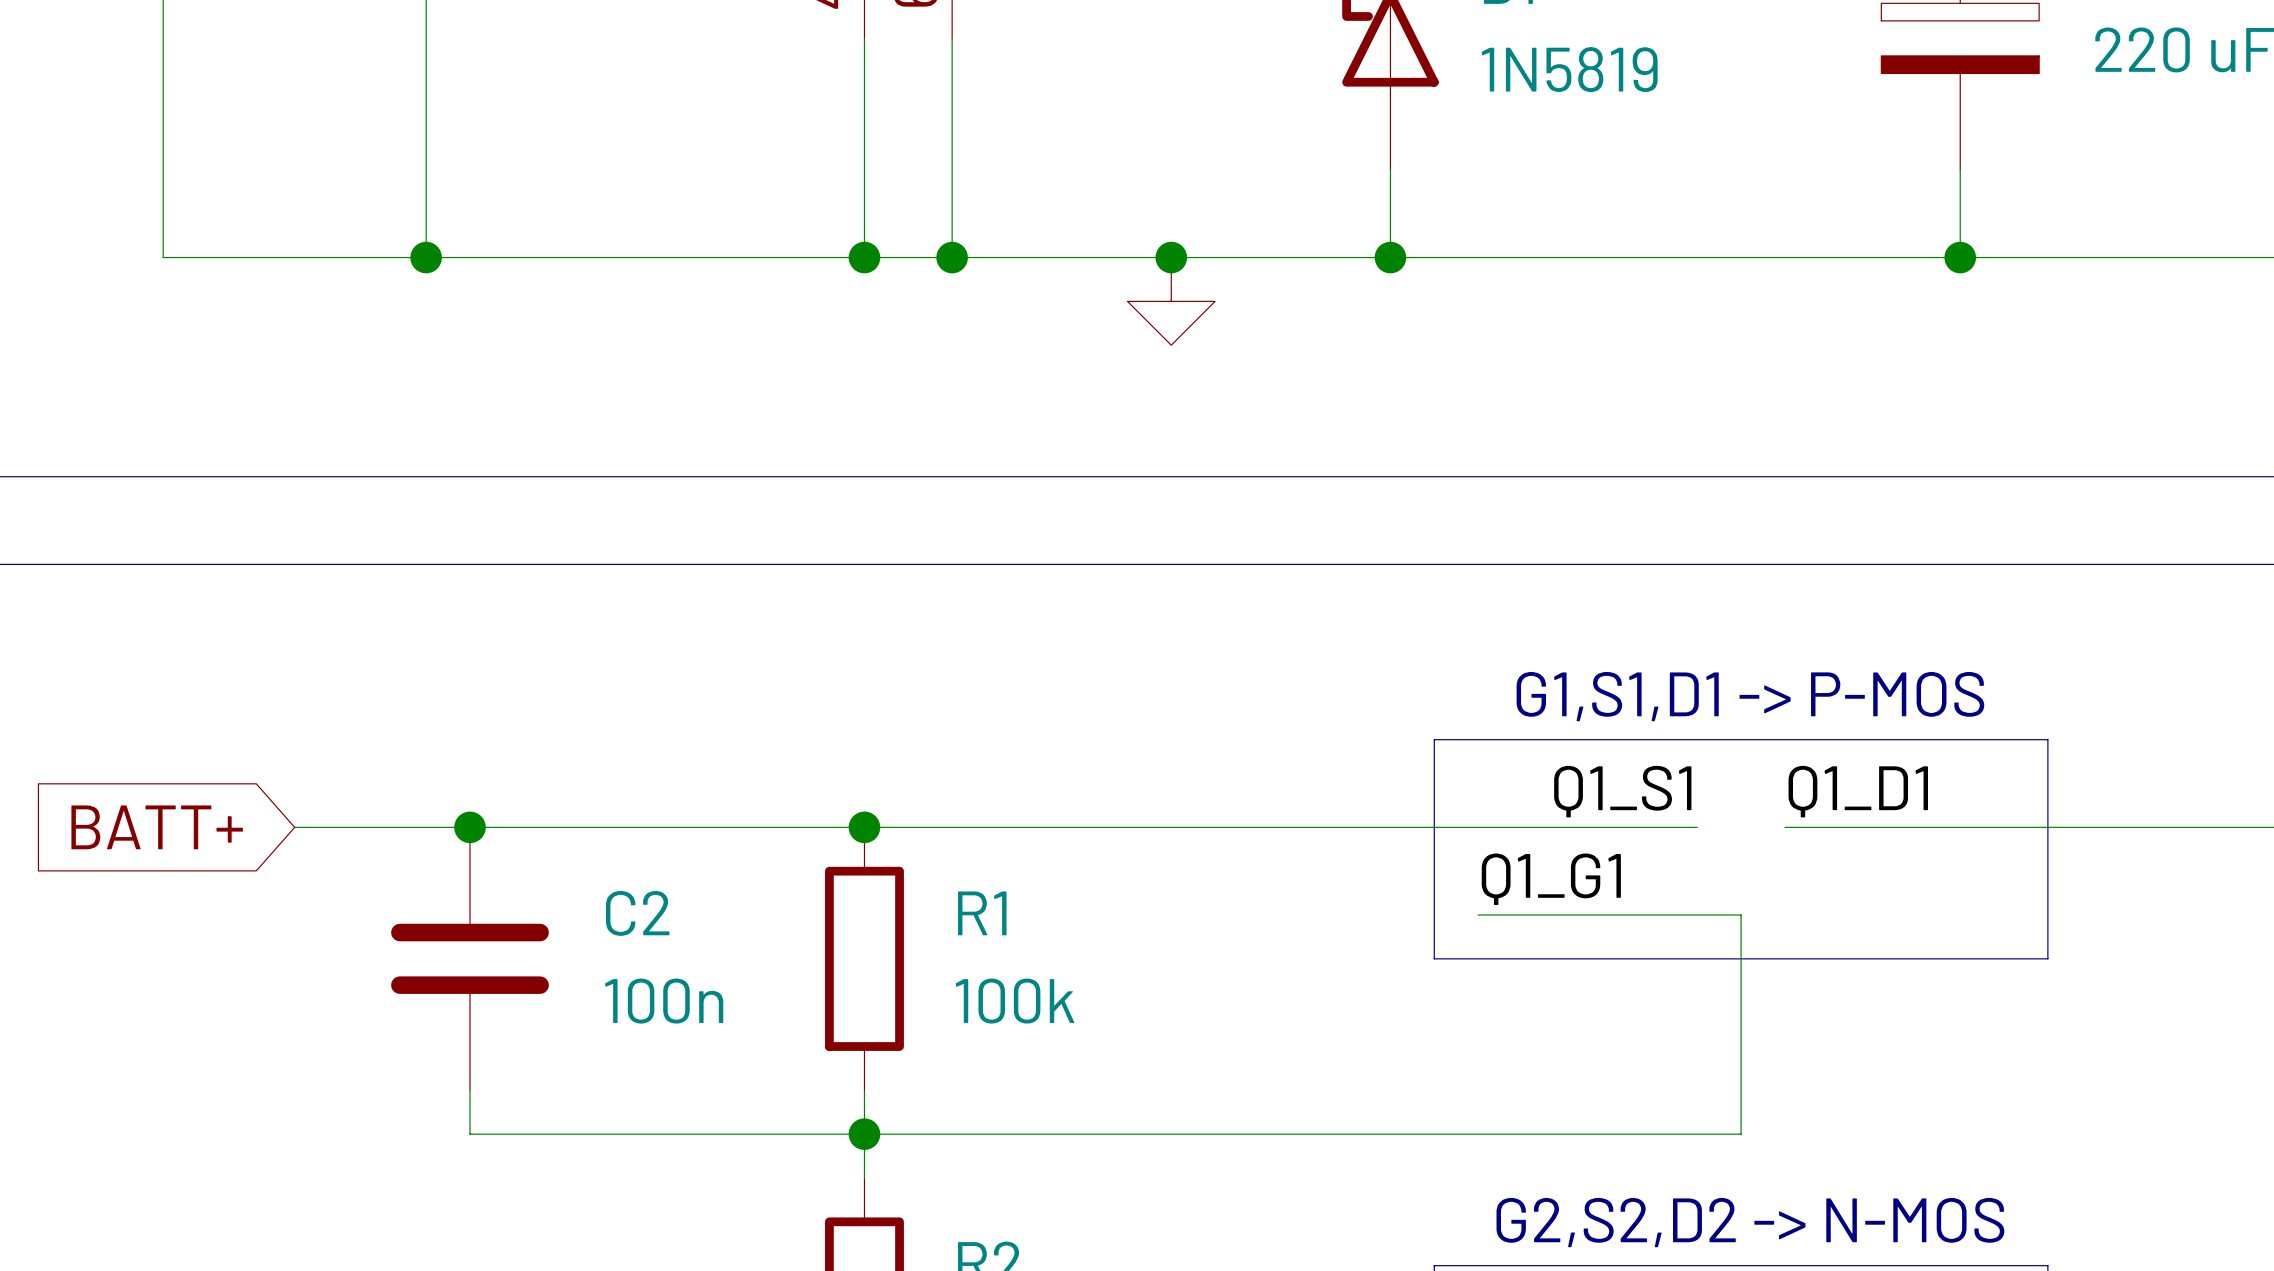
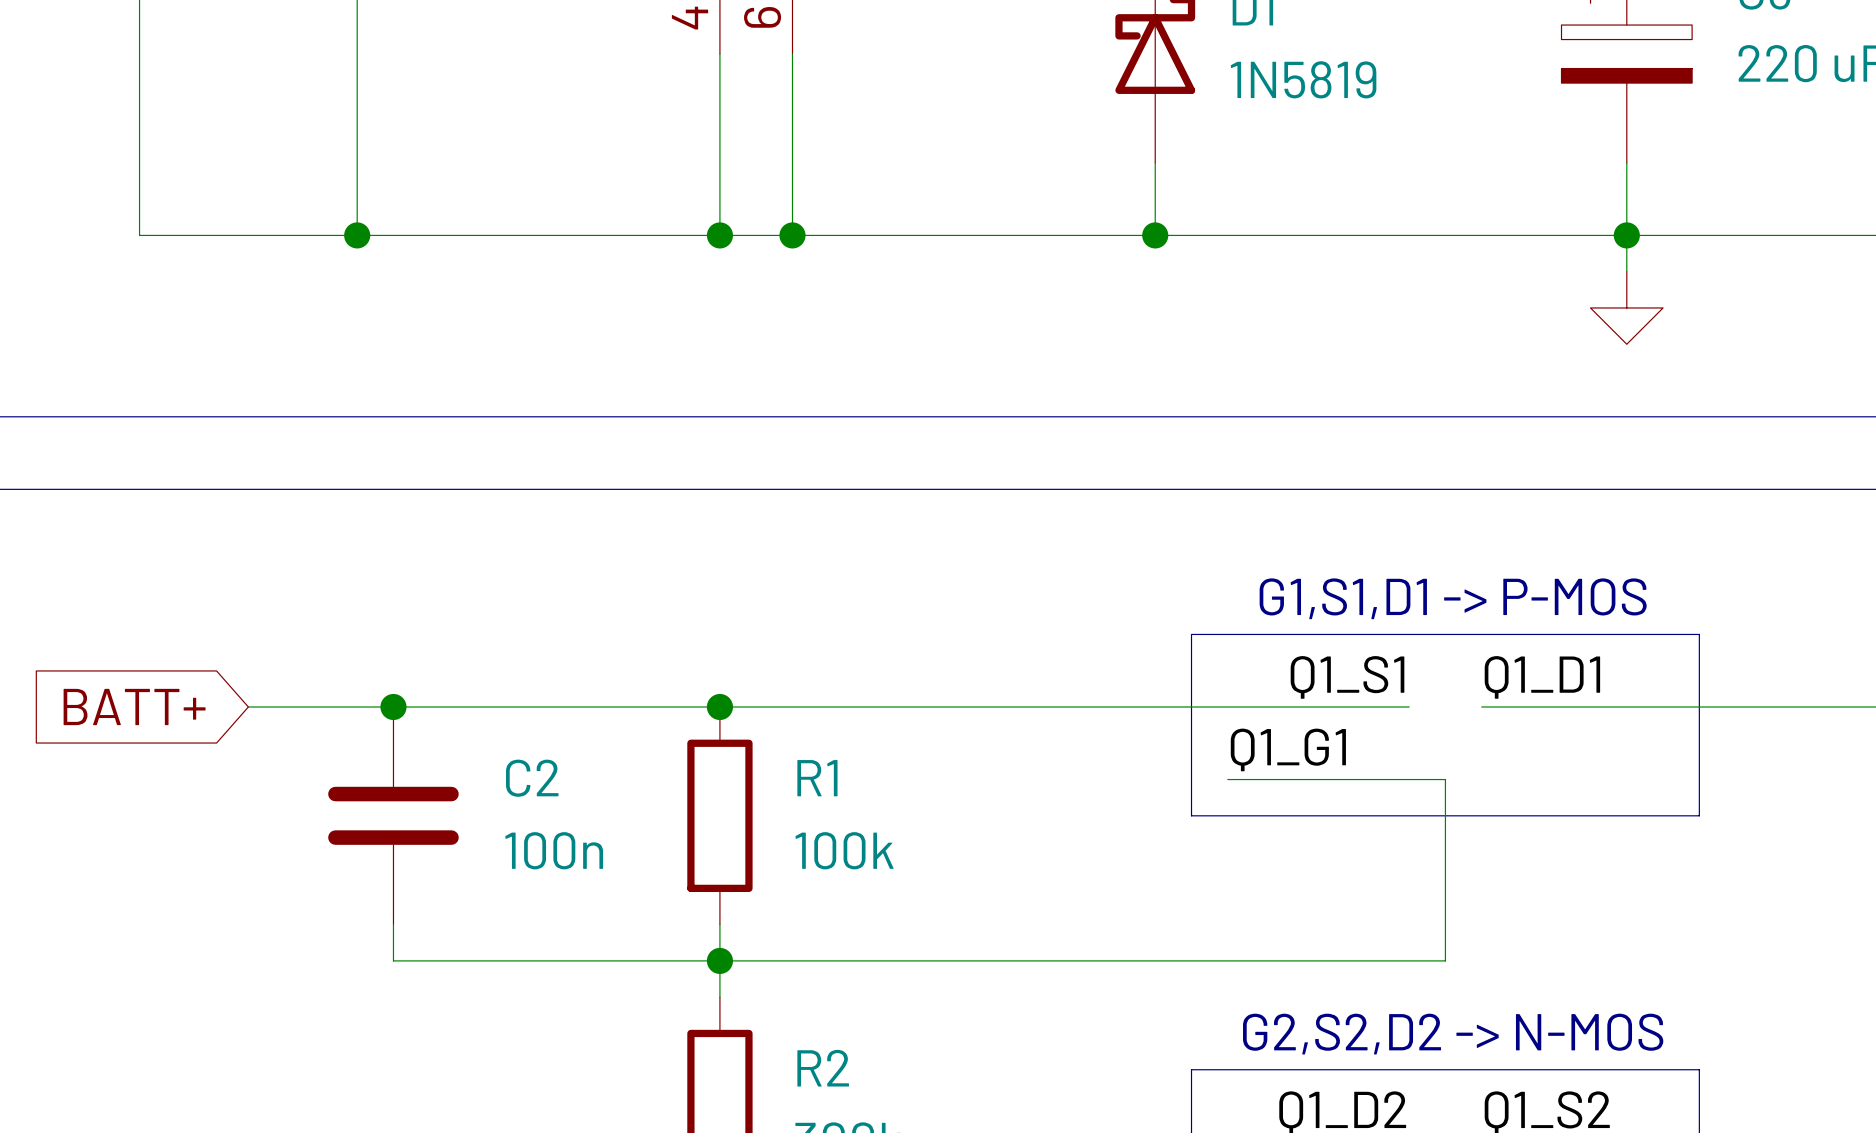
junction: (1171, 257) -> none
wire: none -> (1626, 235) (1626, 271)
power symbol position: (1171, 301) -> (1626, 307)

